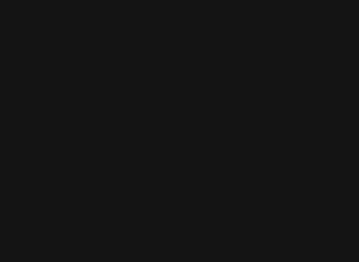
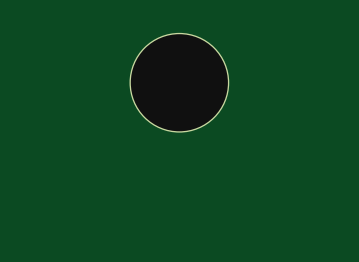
part: none -> (179, 82)

